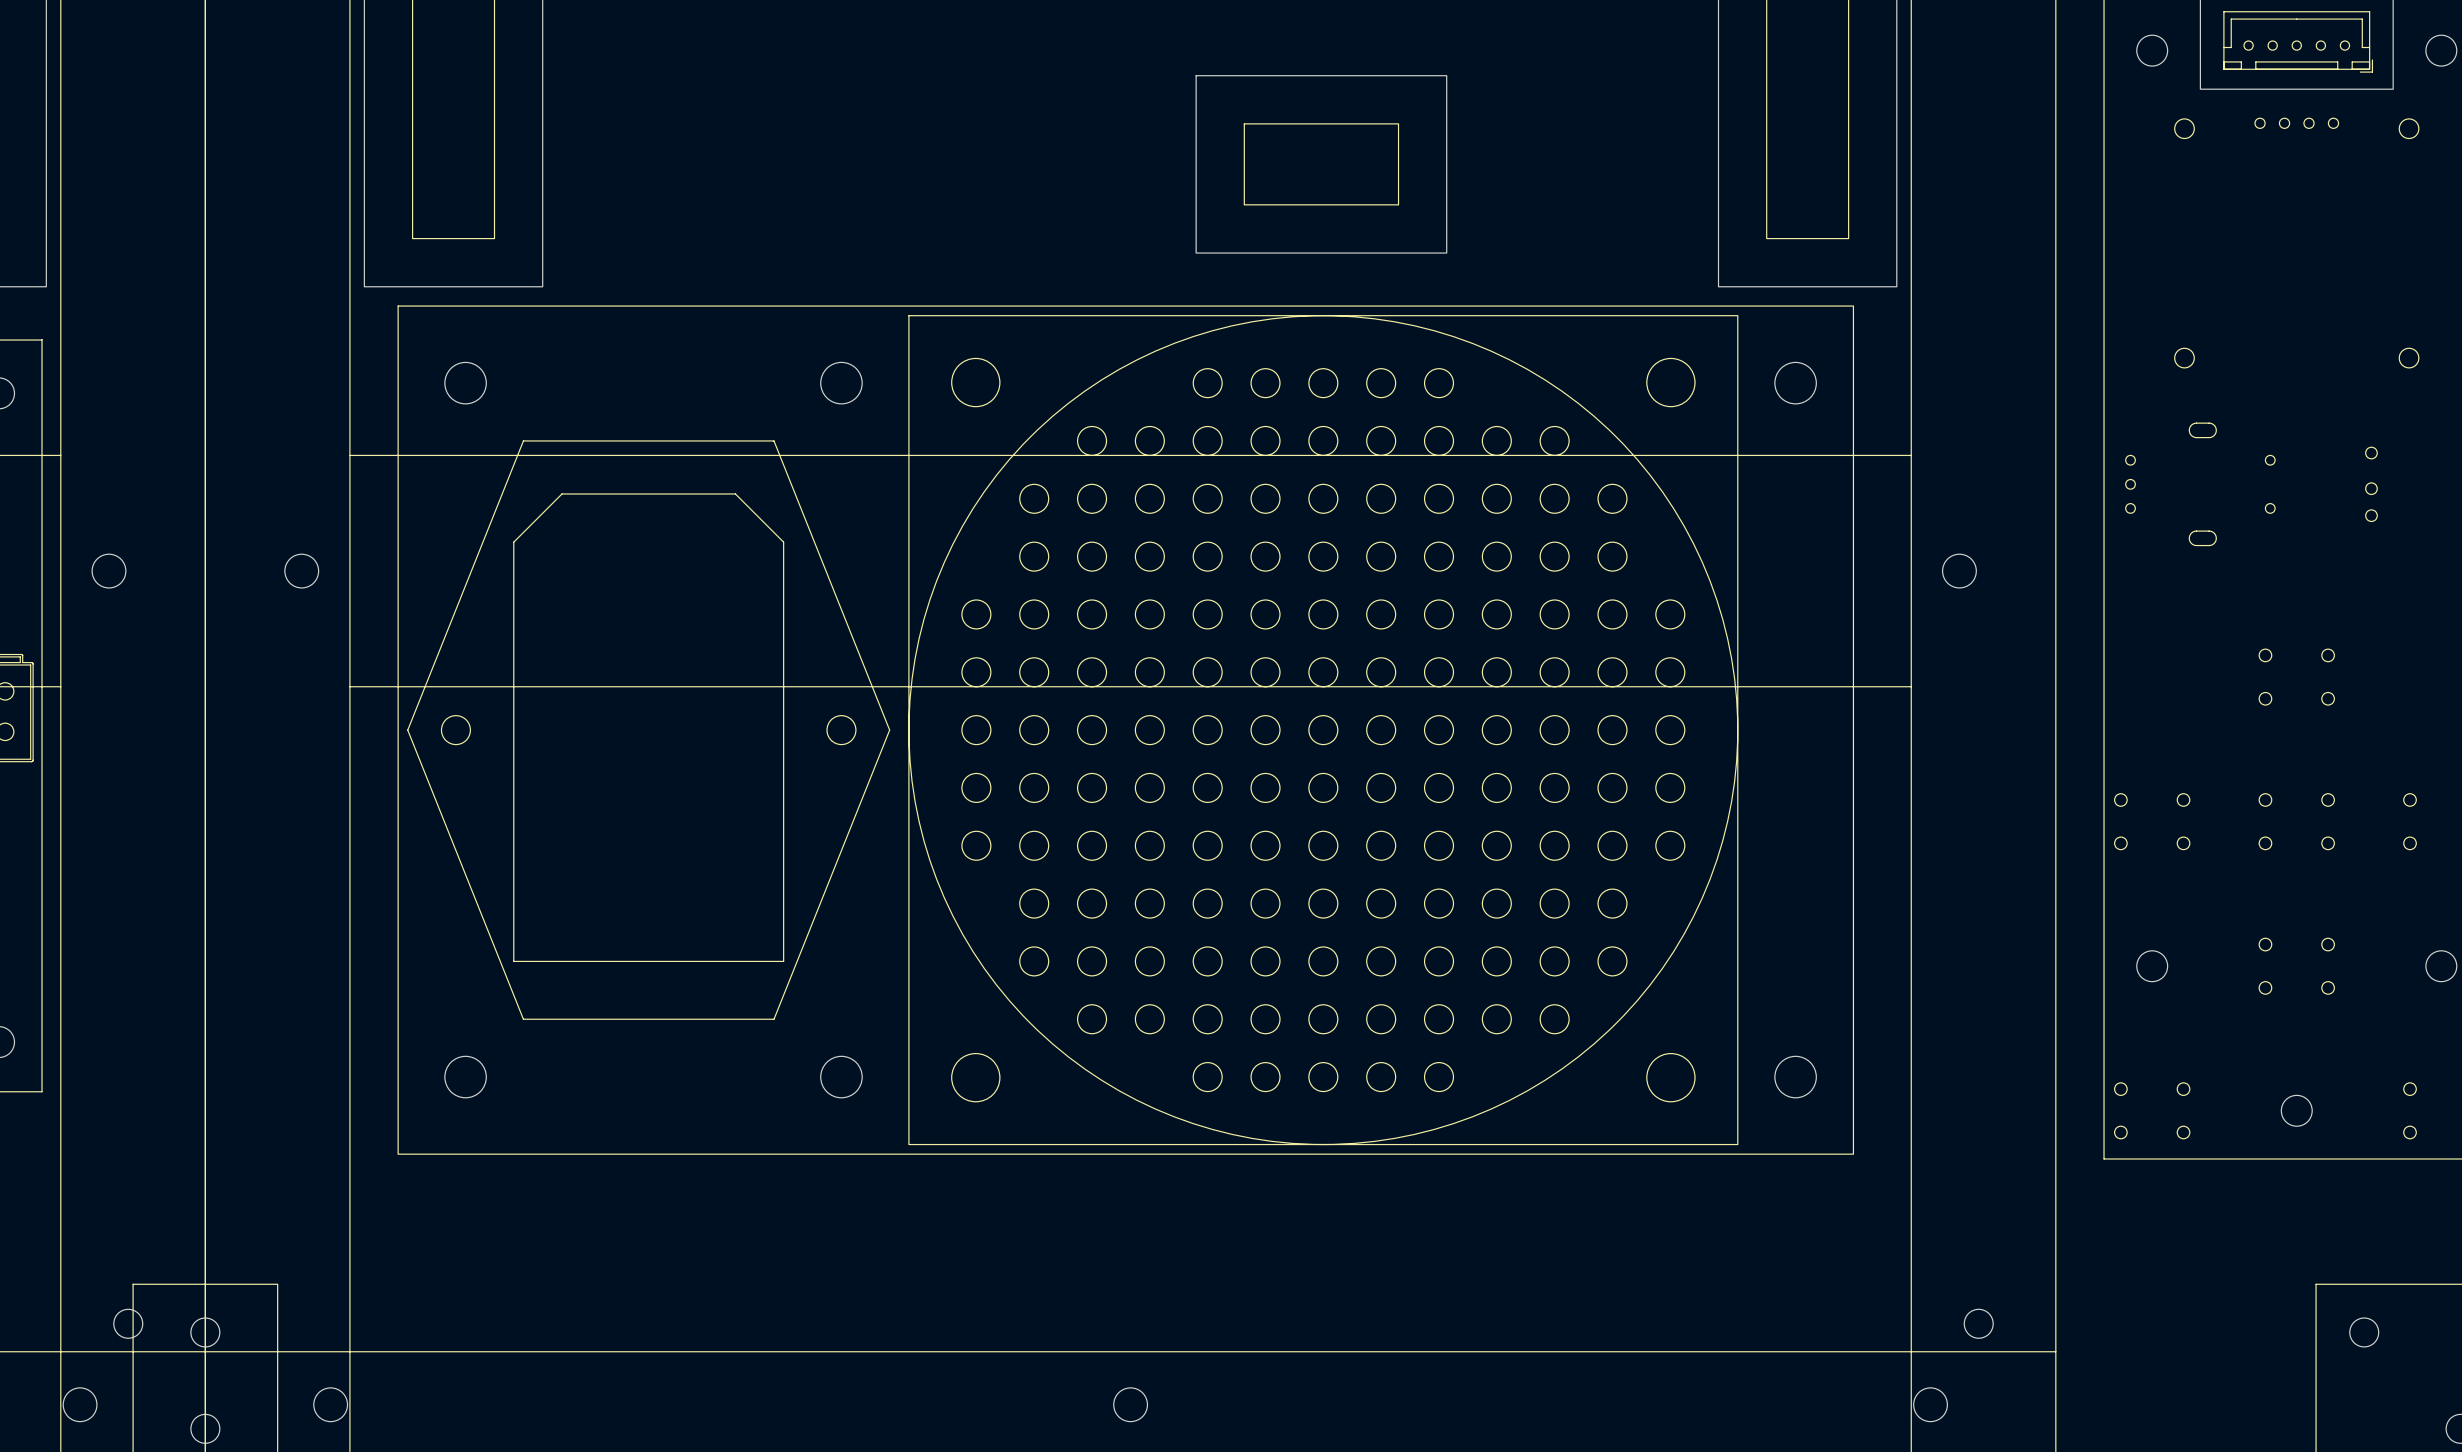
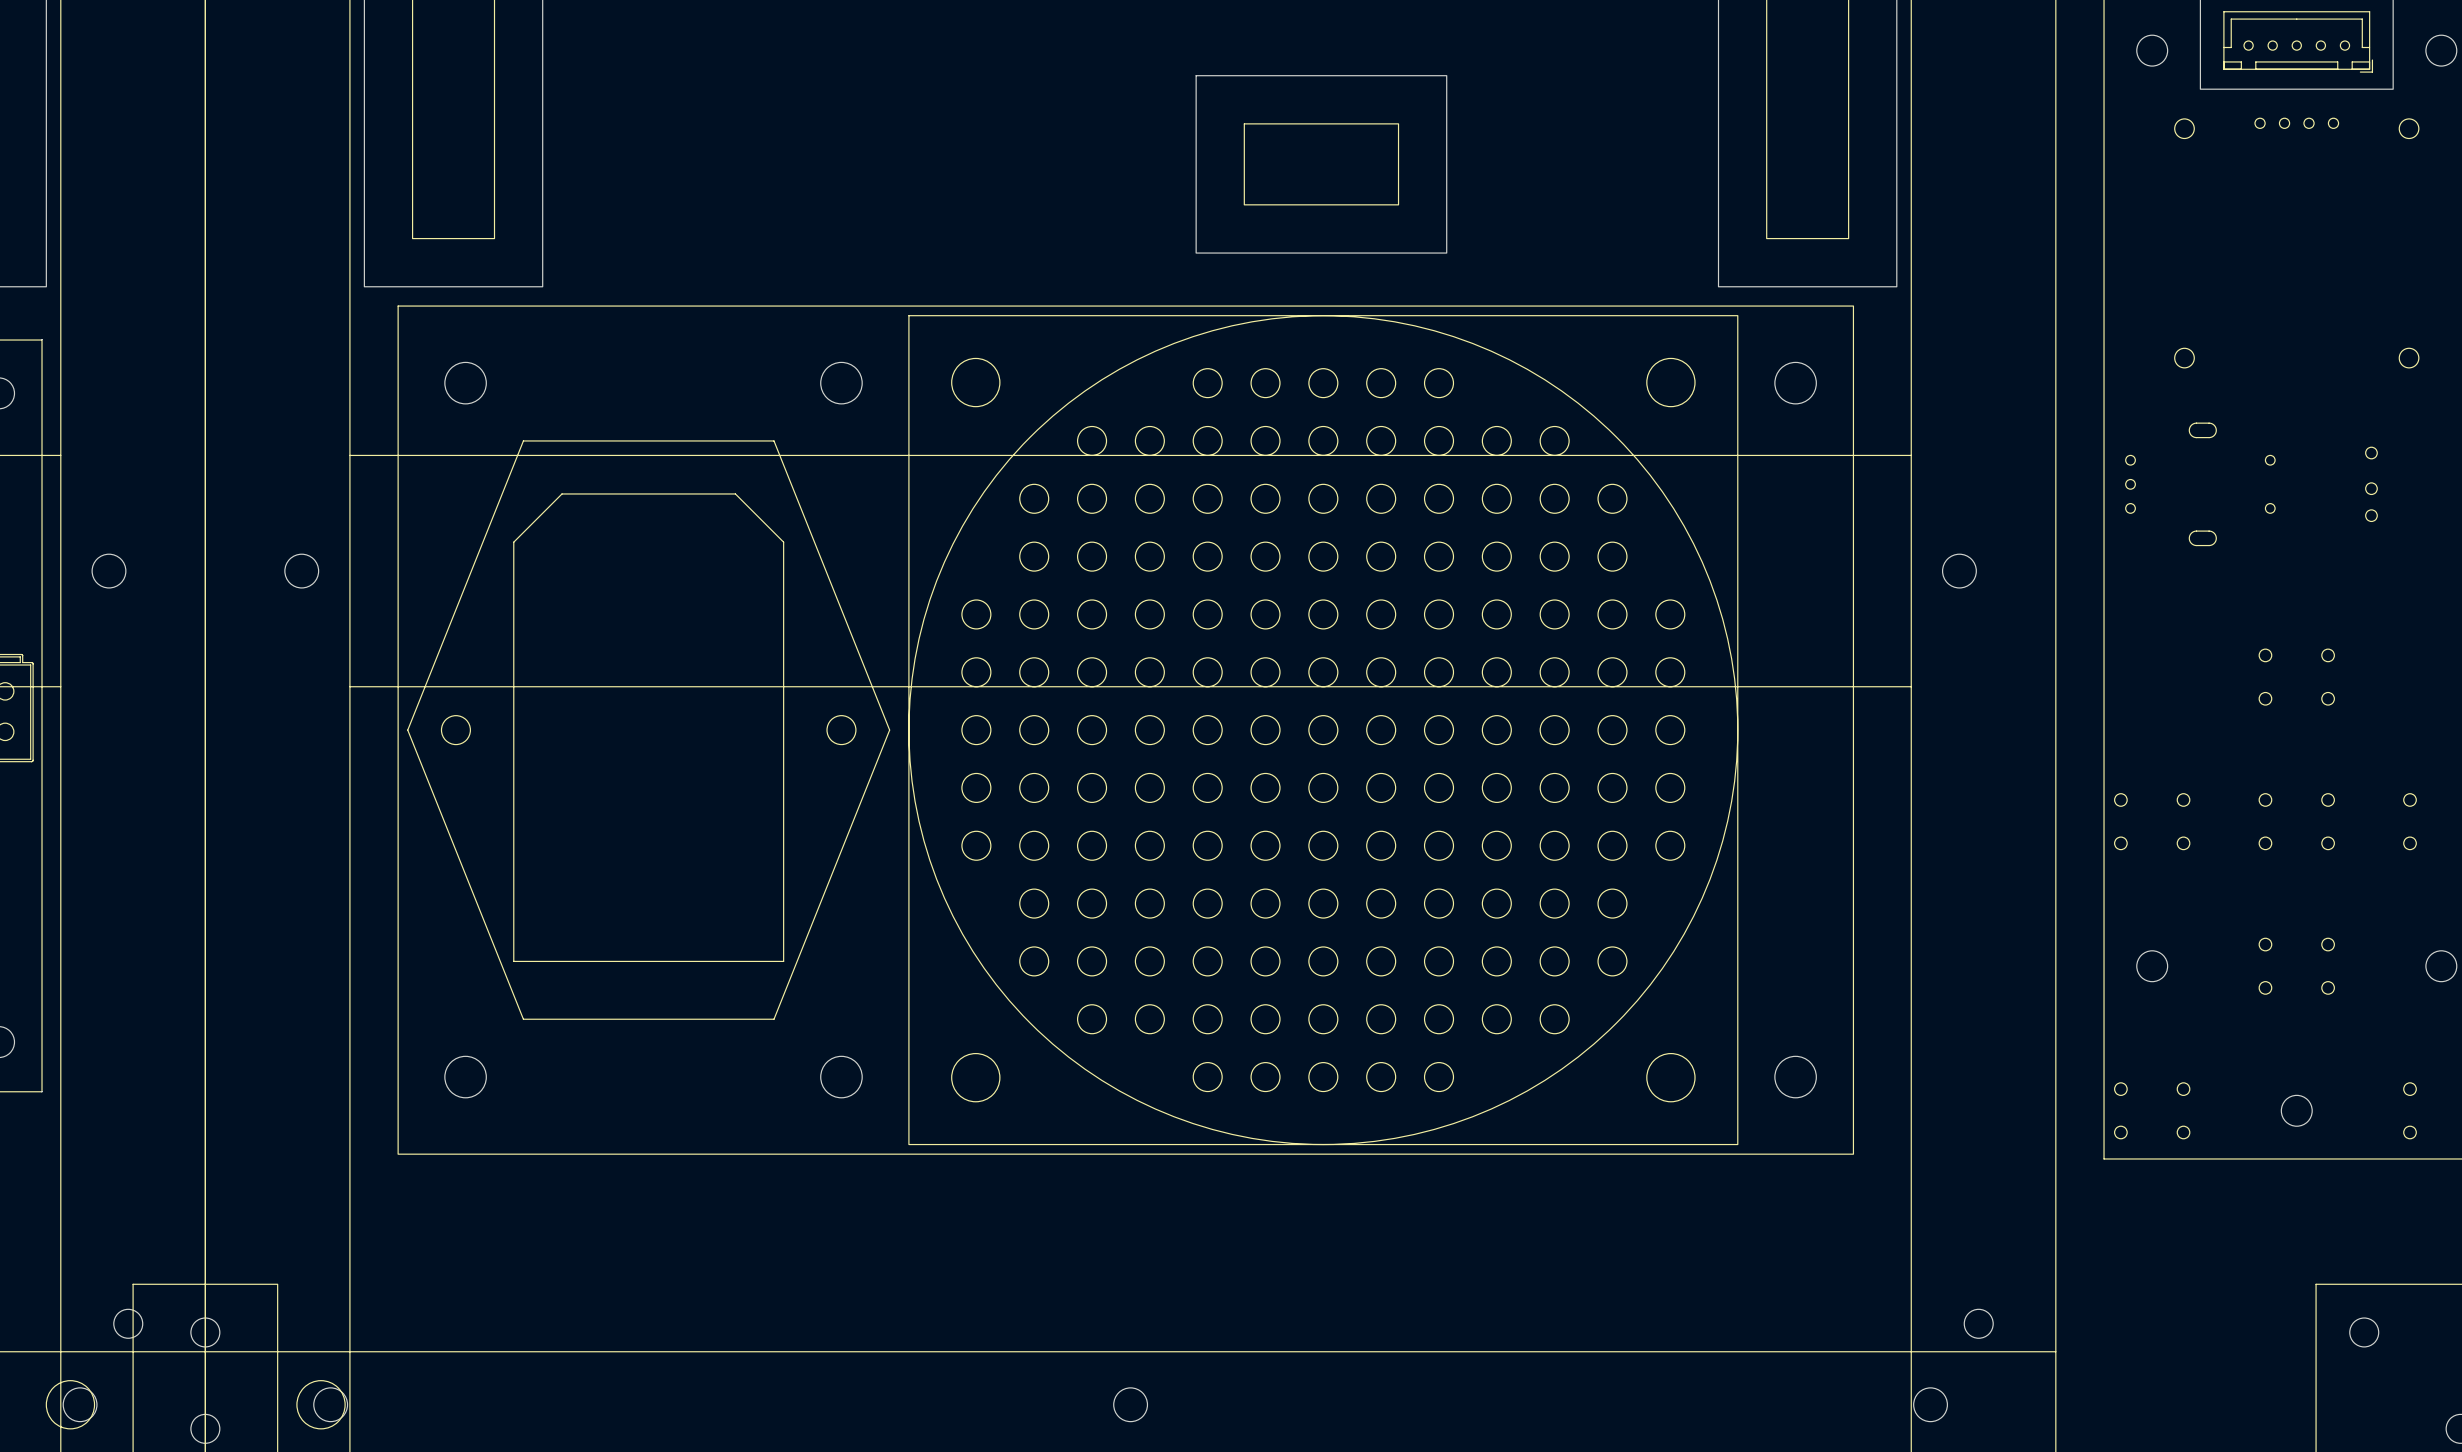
drawing: none -> [45, 1380, 96, 1430]
drawing: none -> [296, 1380, 346, 1430]

